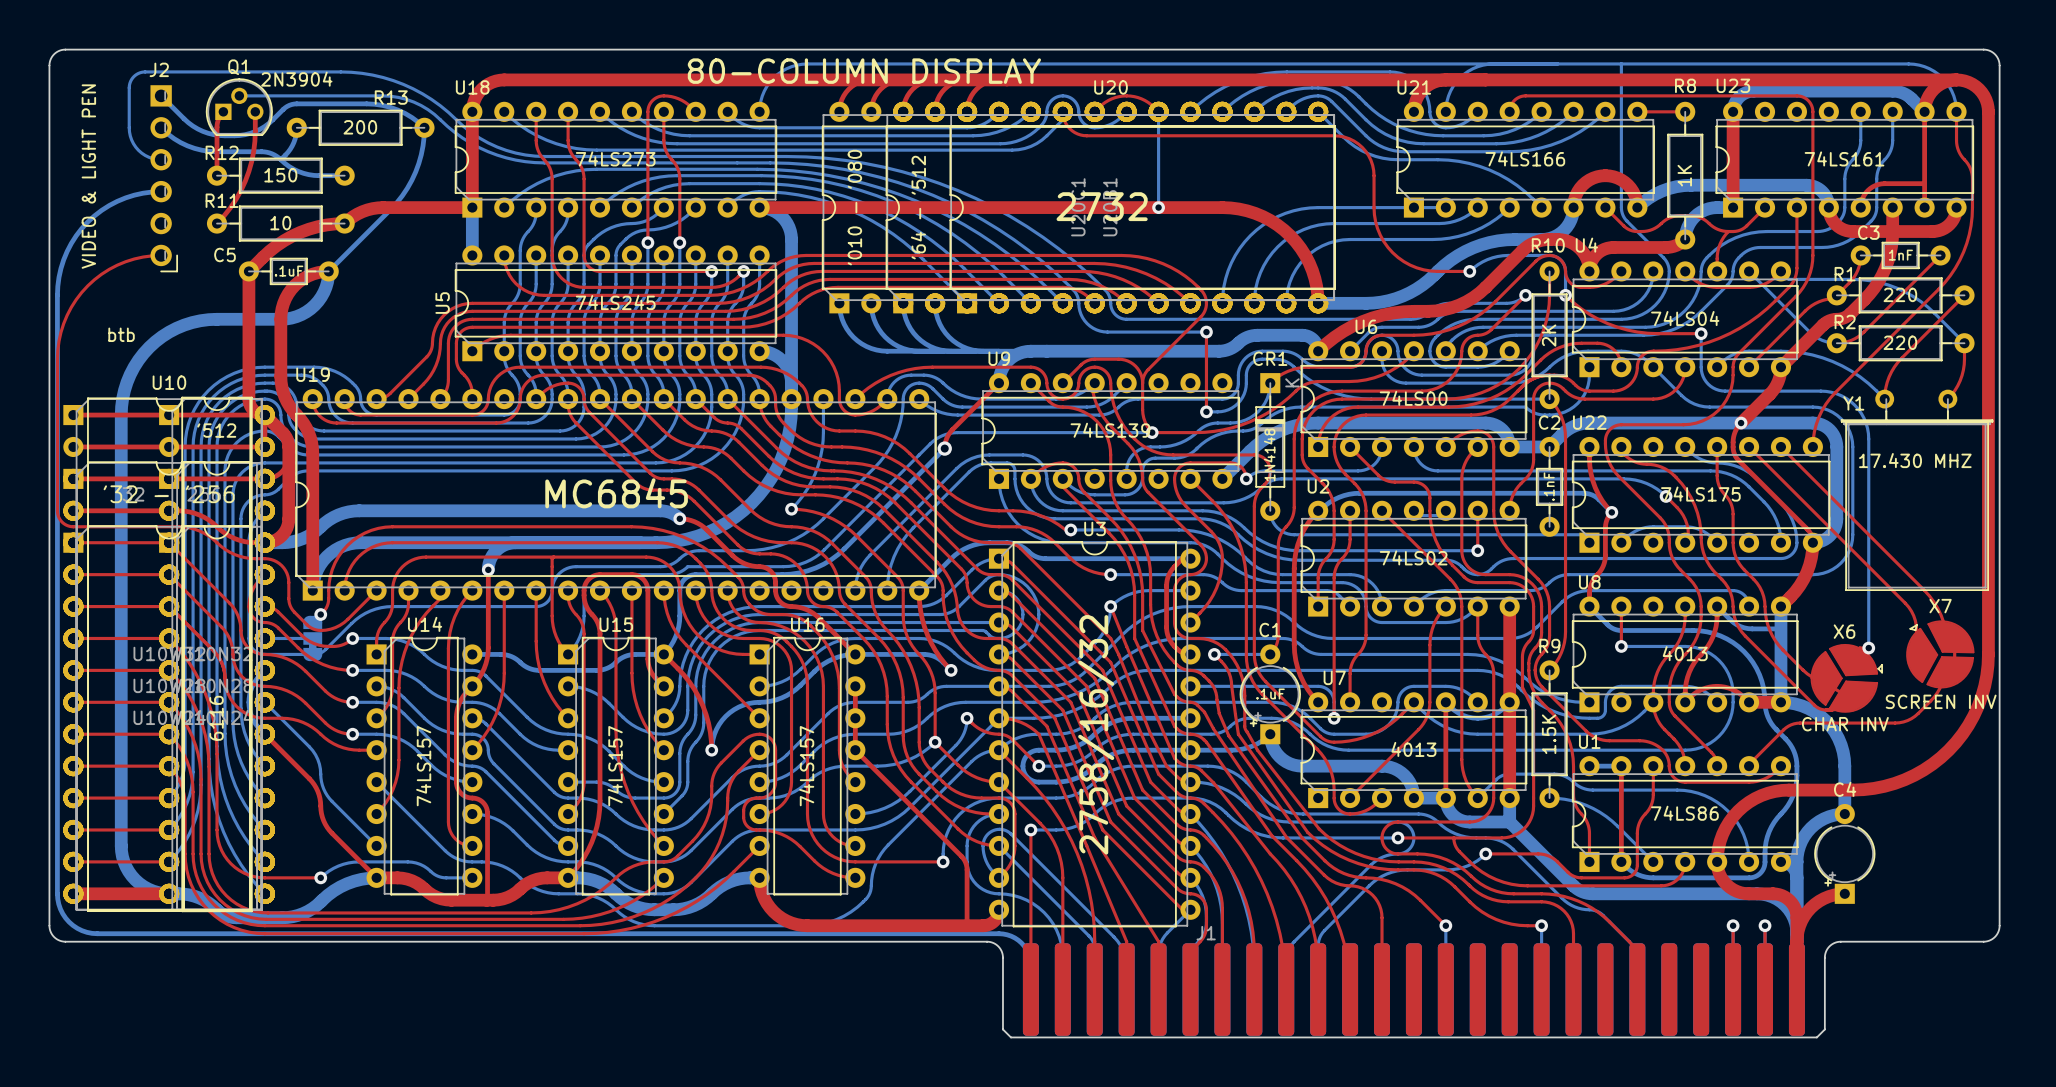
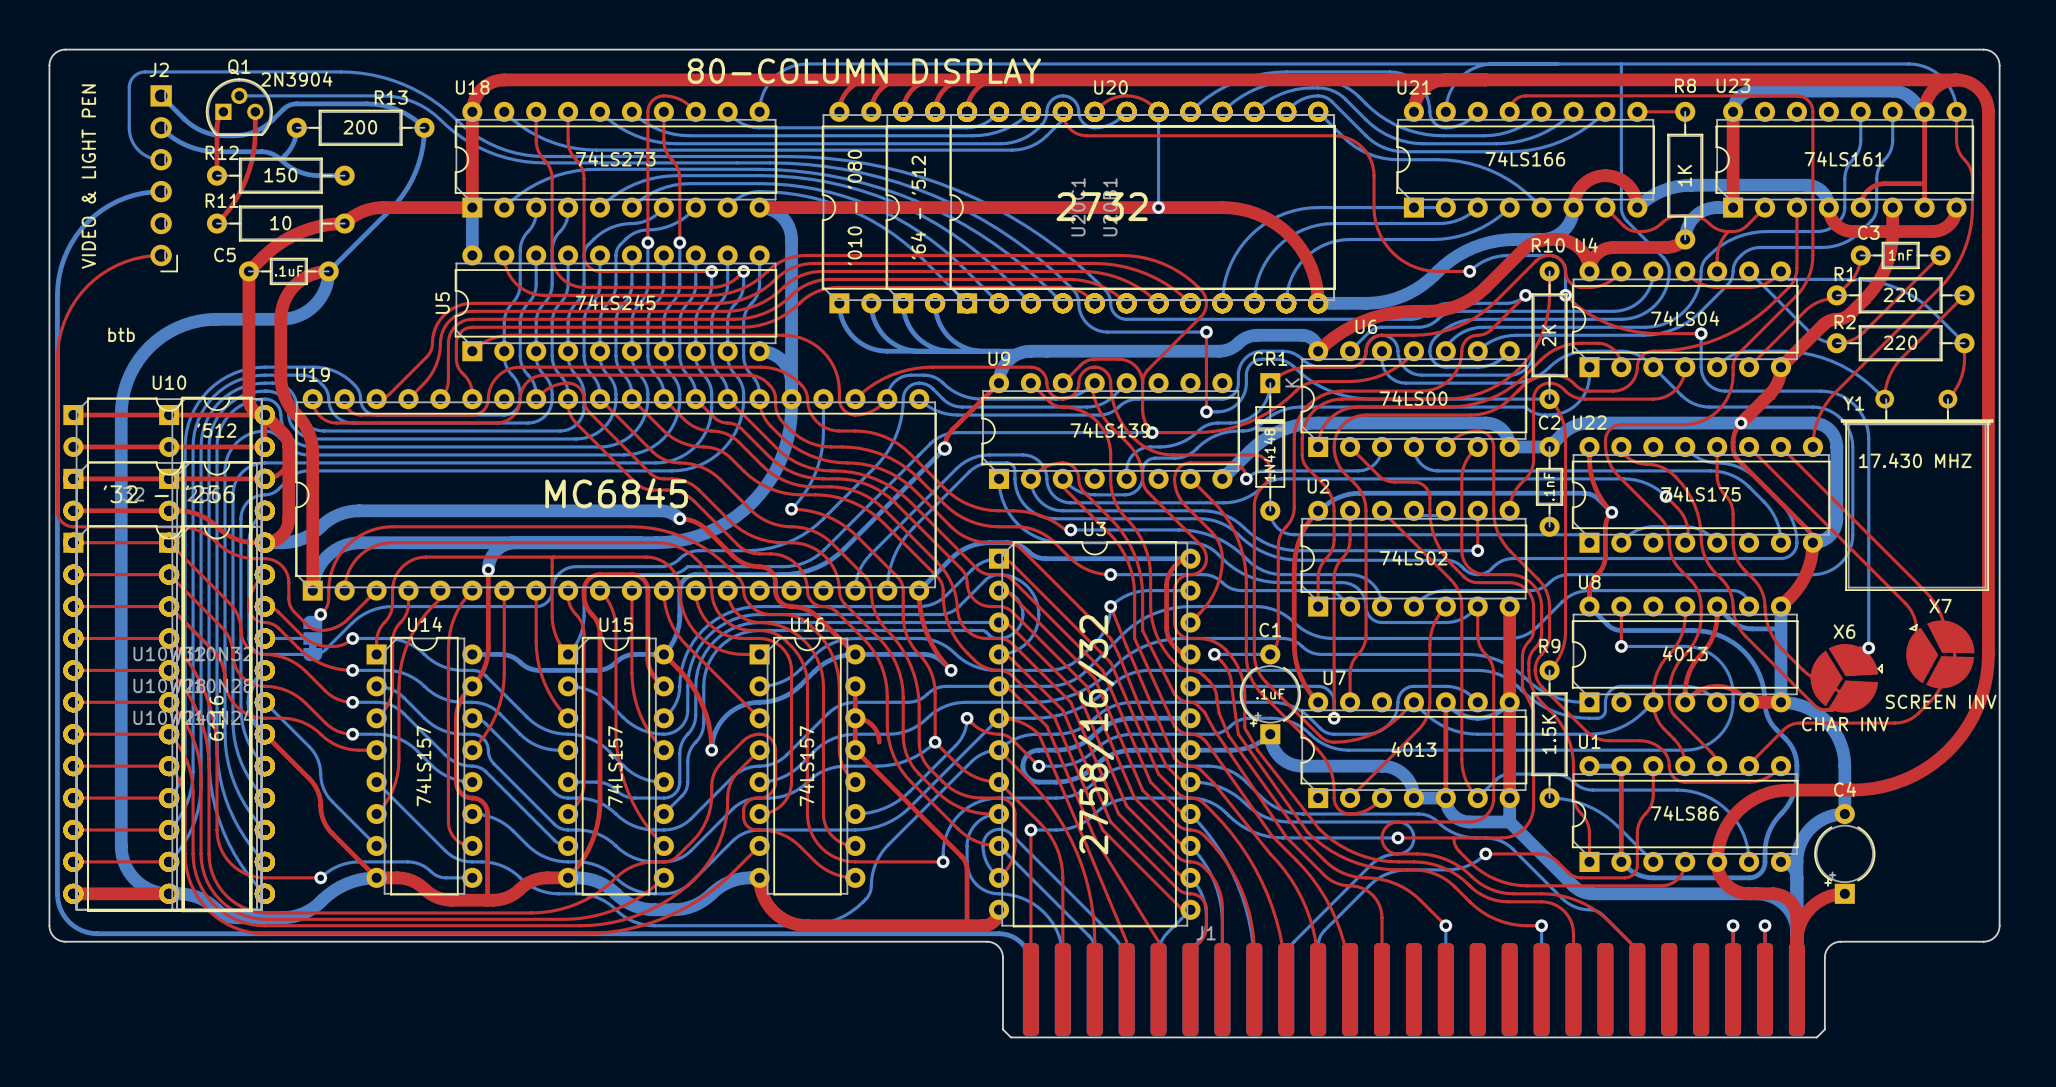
top track: none -> (855, 718) (864, 720) (872, 725) (877, 733) (879, 742)

